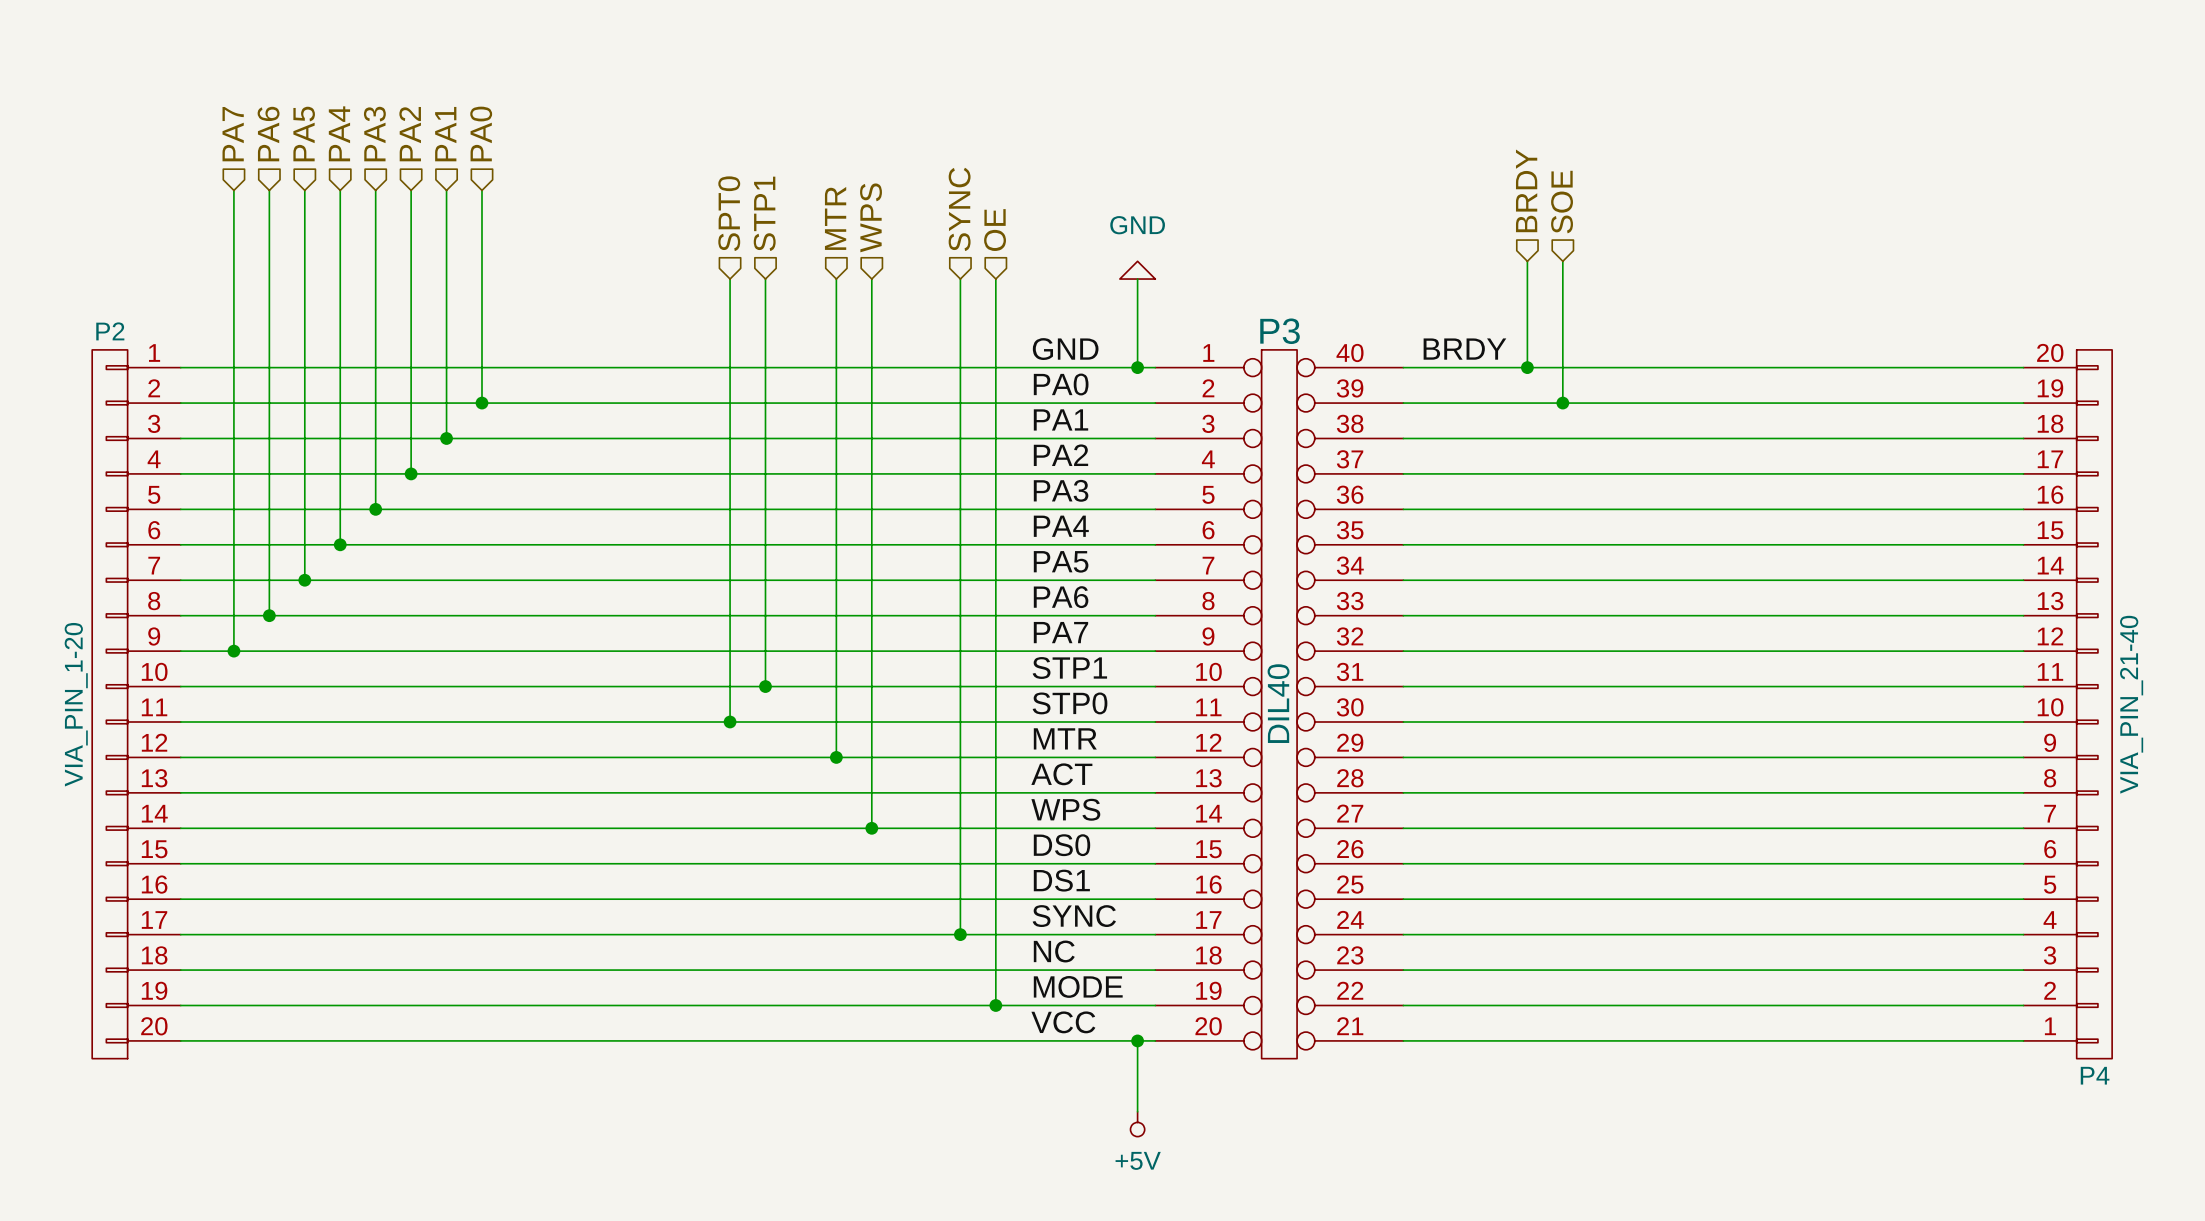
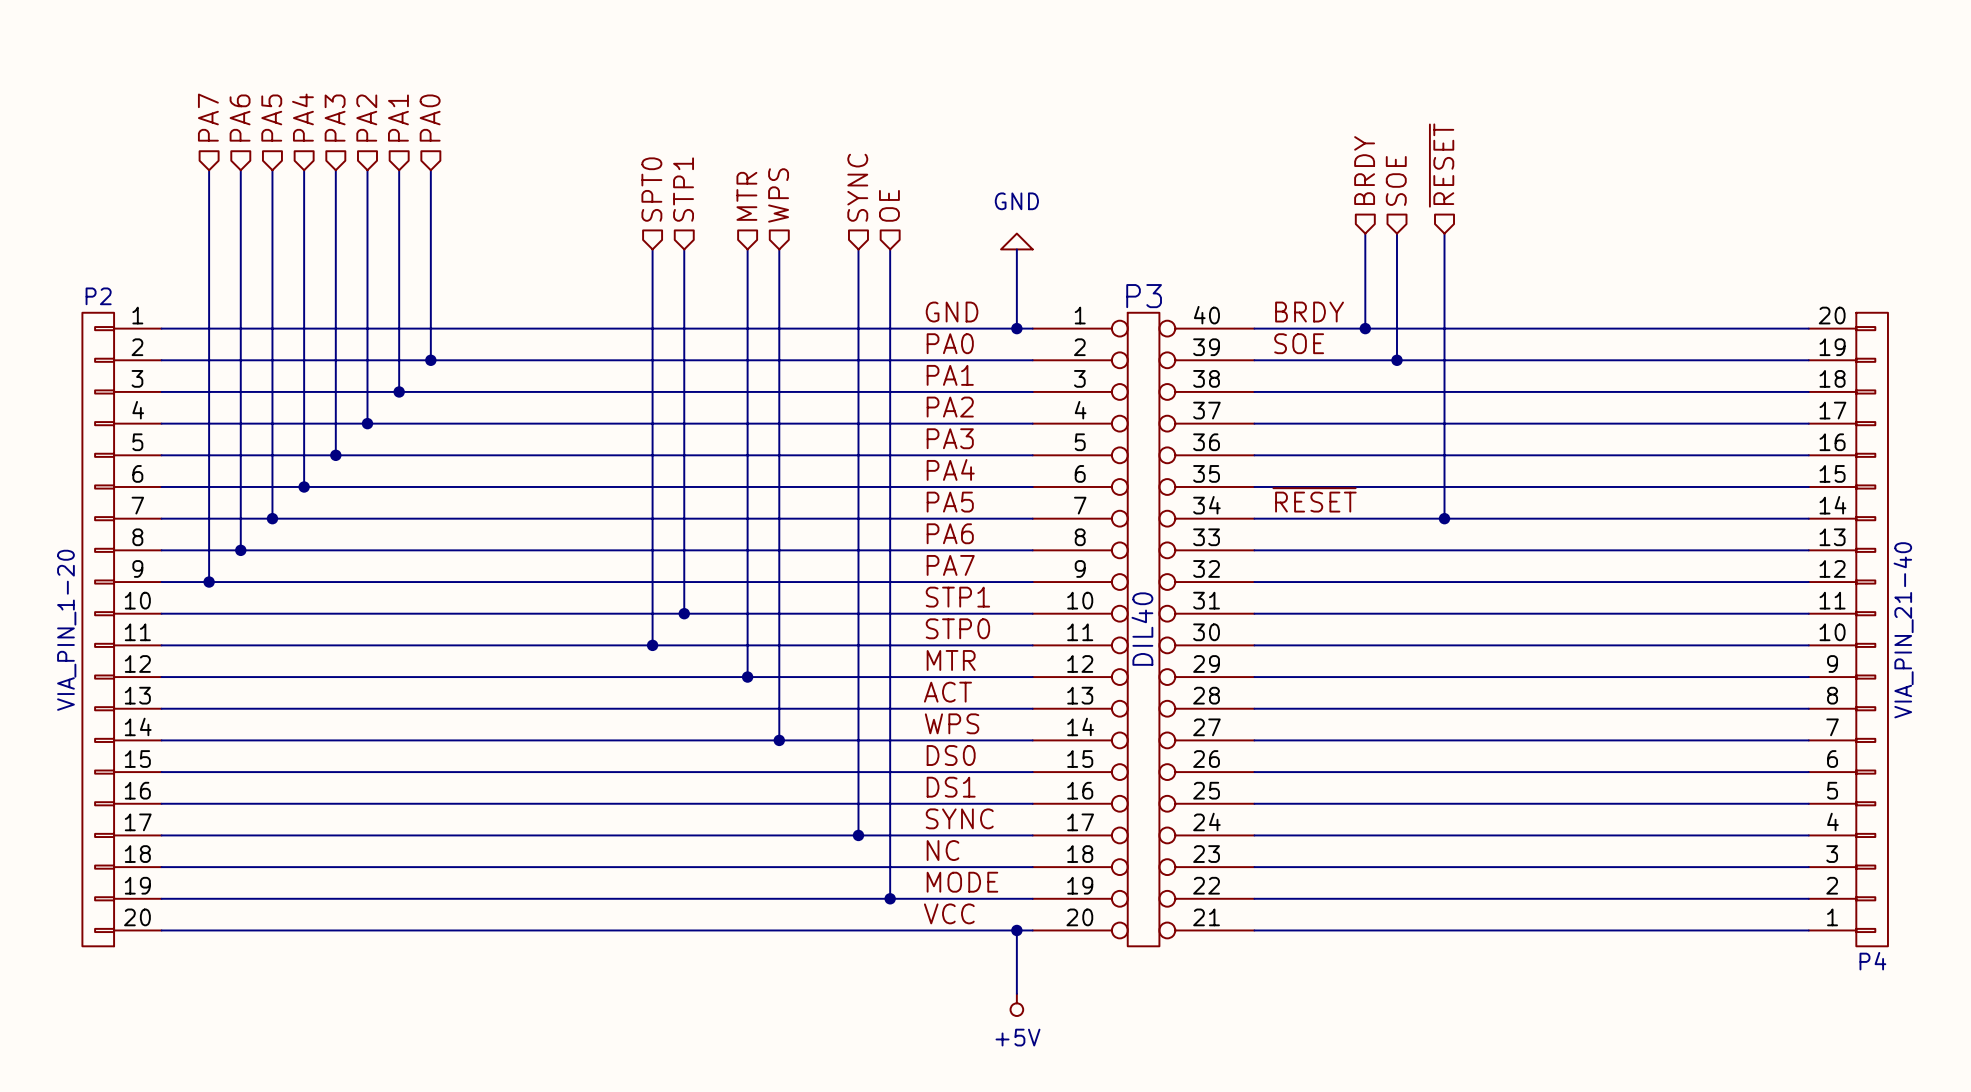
hierarchical label: none -> ~{RESET} (1441, 165)
wire: none -> (1444, 233) (1444, 518)
label: none -> SOE (1299, 343)
label: none -> ~{RESET} (1314, 499)
junction: none -> (1444, 518)

